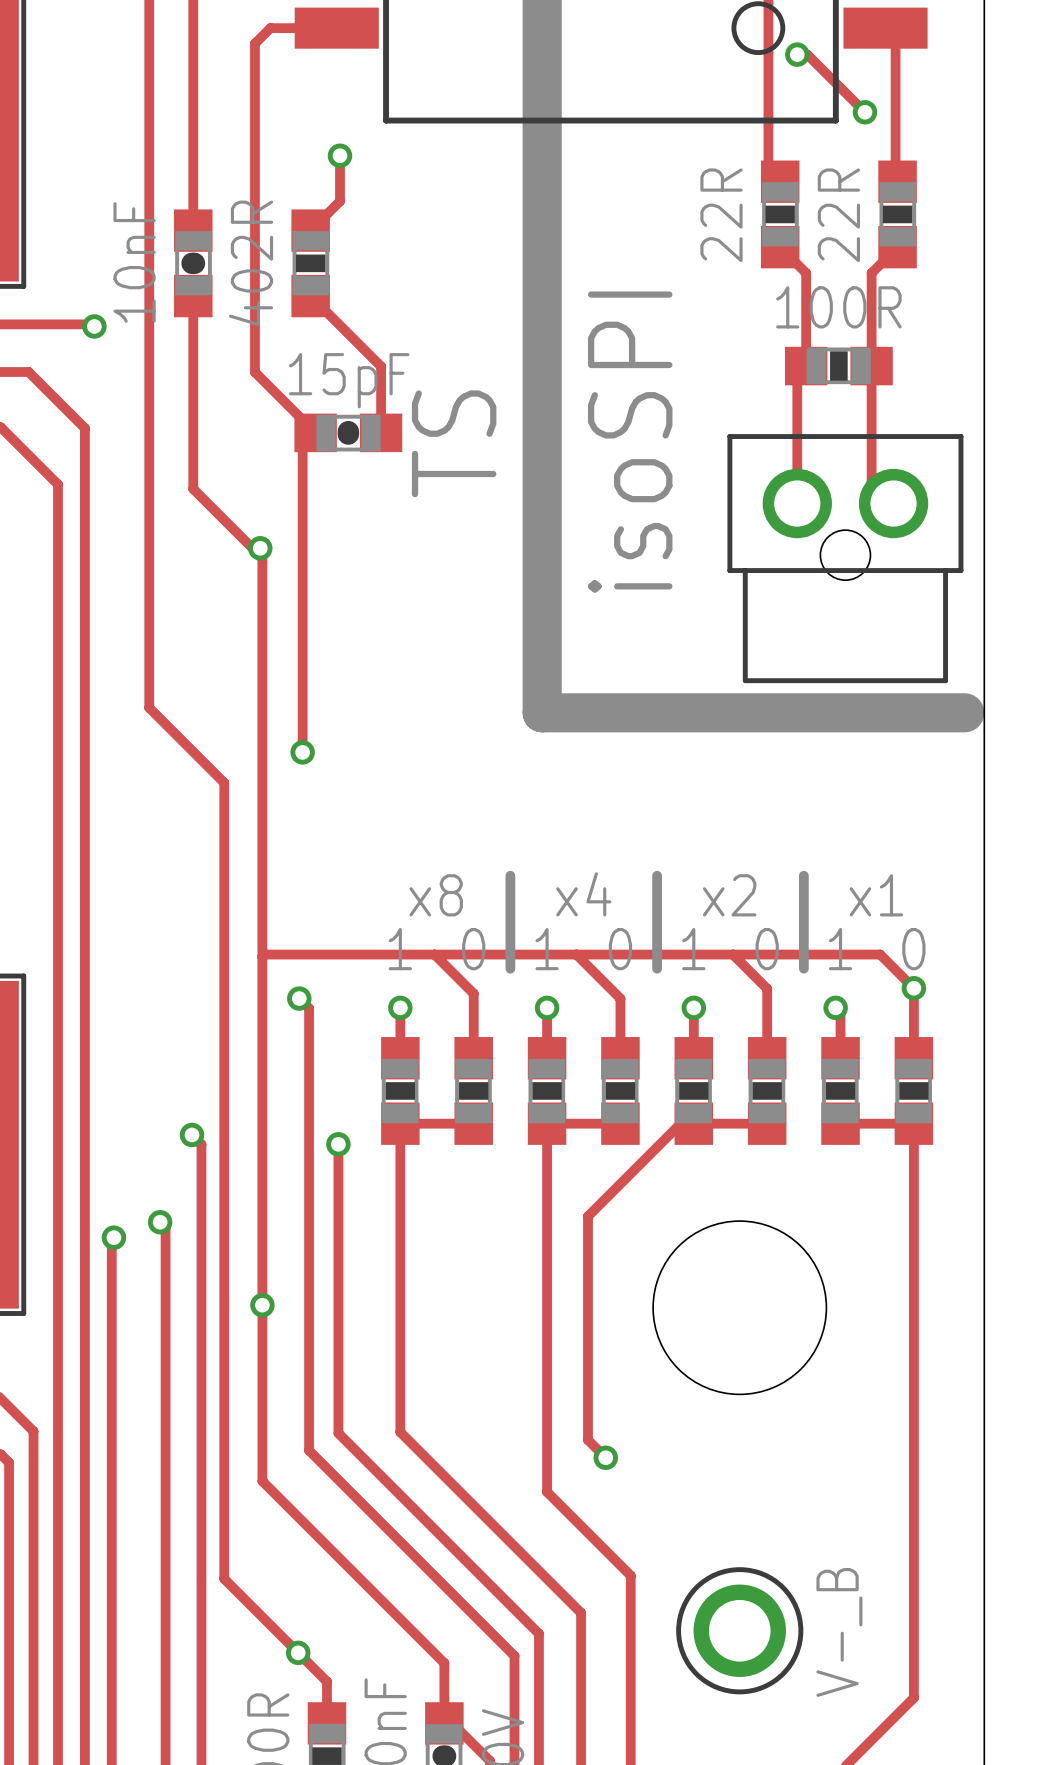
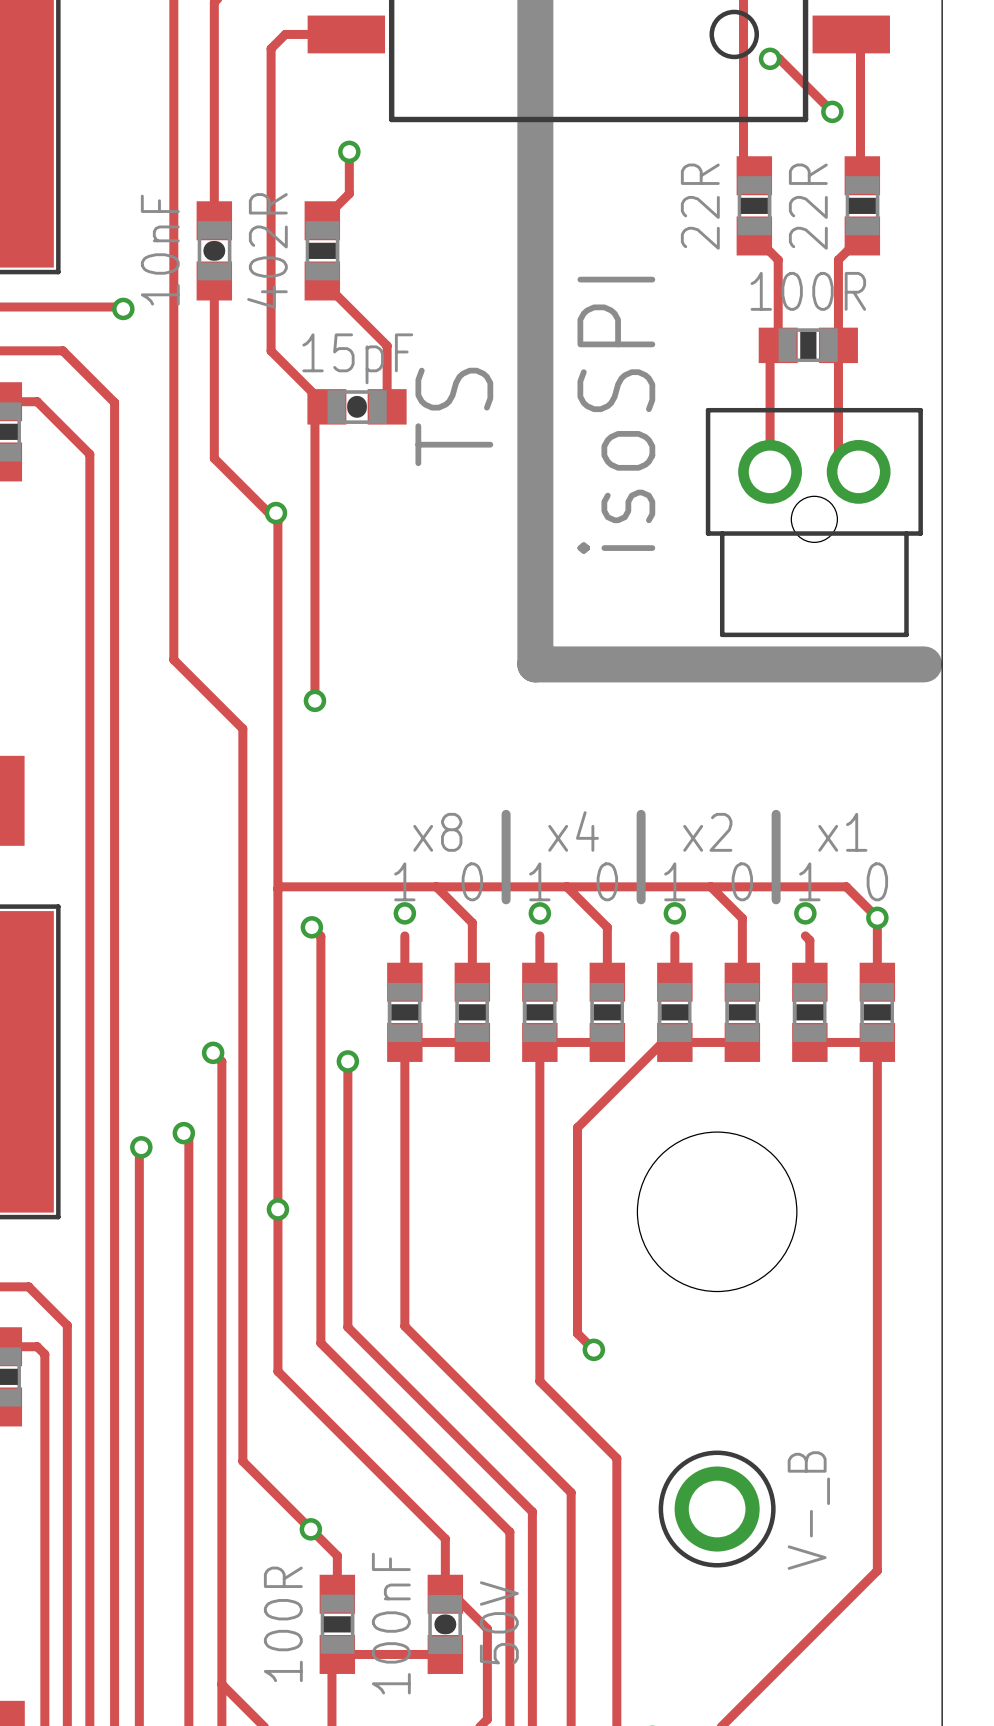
via position: (400, 1007) -> (404, 913)
via position: (547, 1007) -> (539, 913)
via position: (693, 1007) -> (674, 913)
via position: (835, 1007) -> (805, 913)

